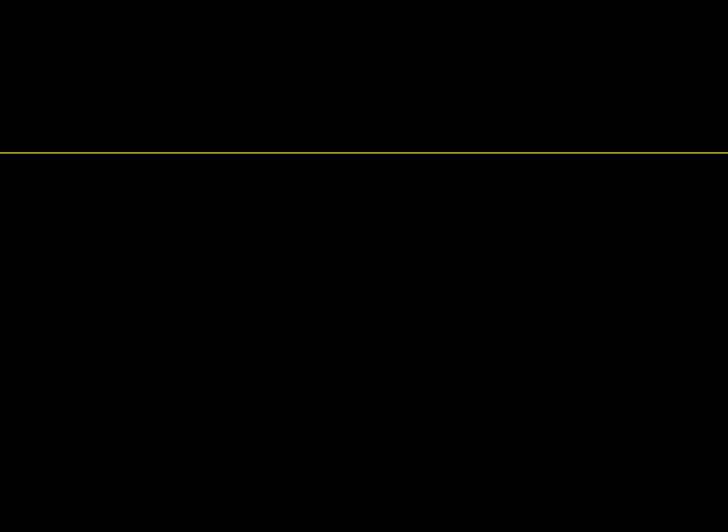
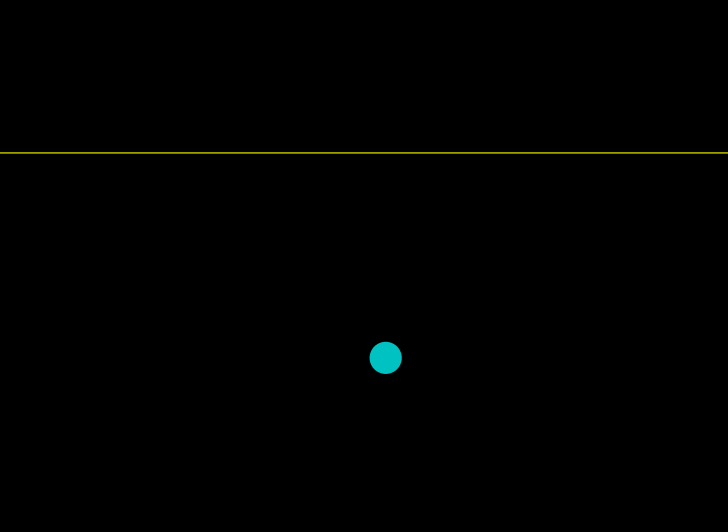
drawing: none -> [369, 341, 402, 374]

